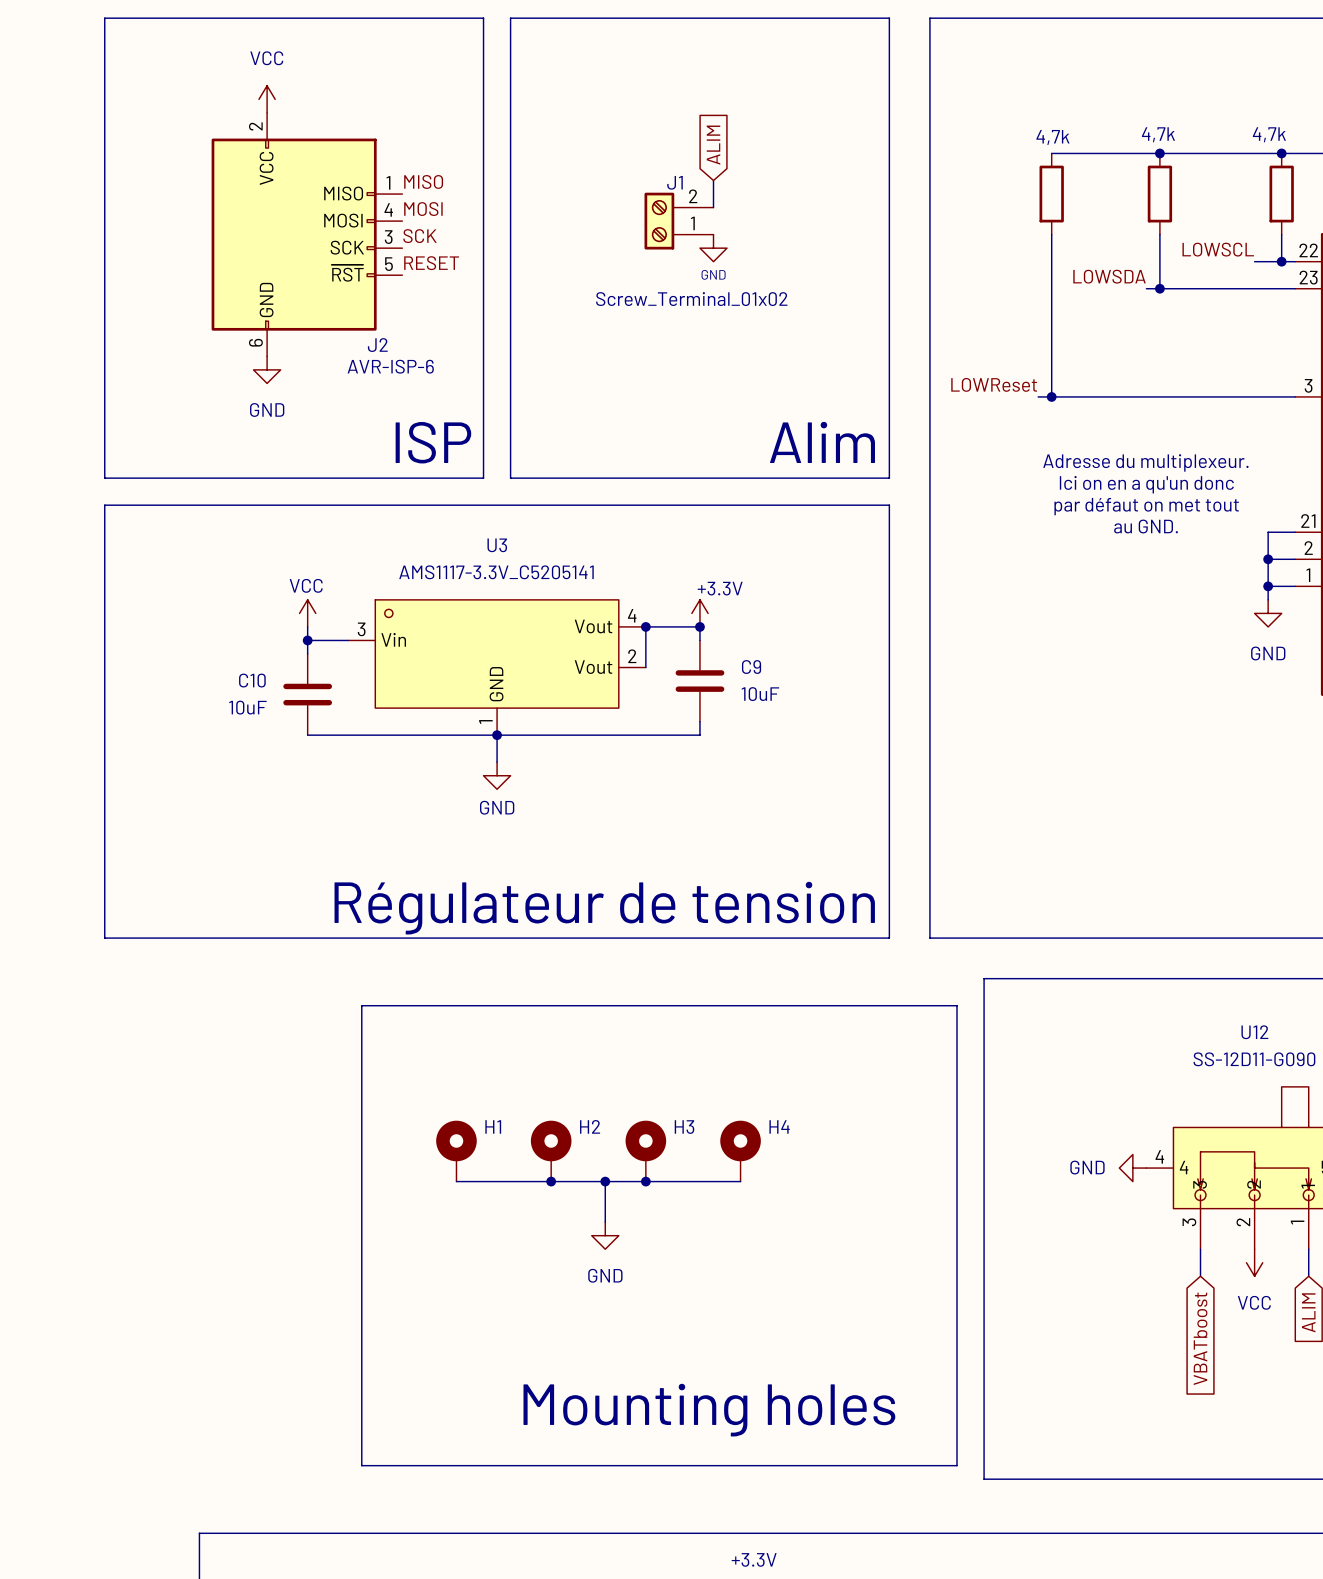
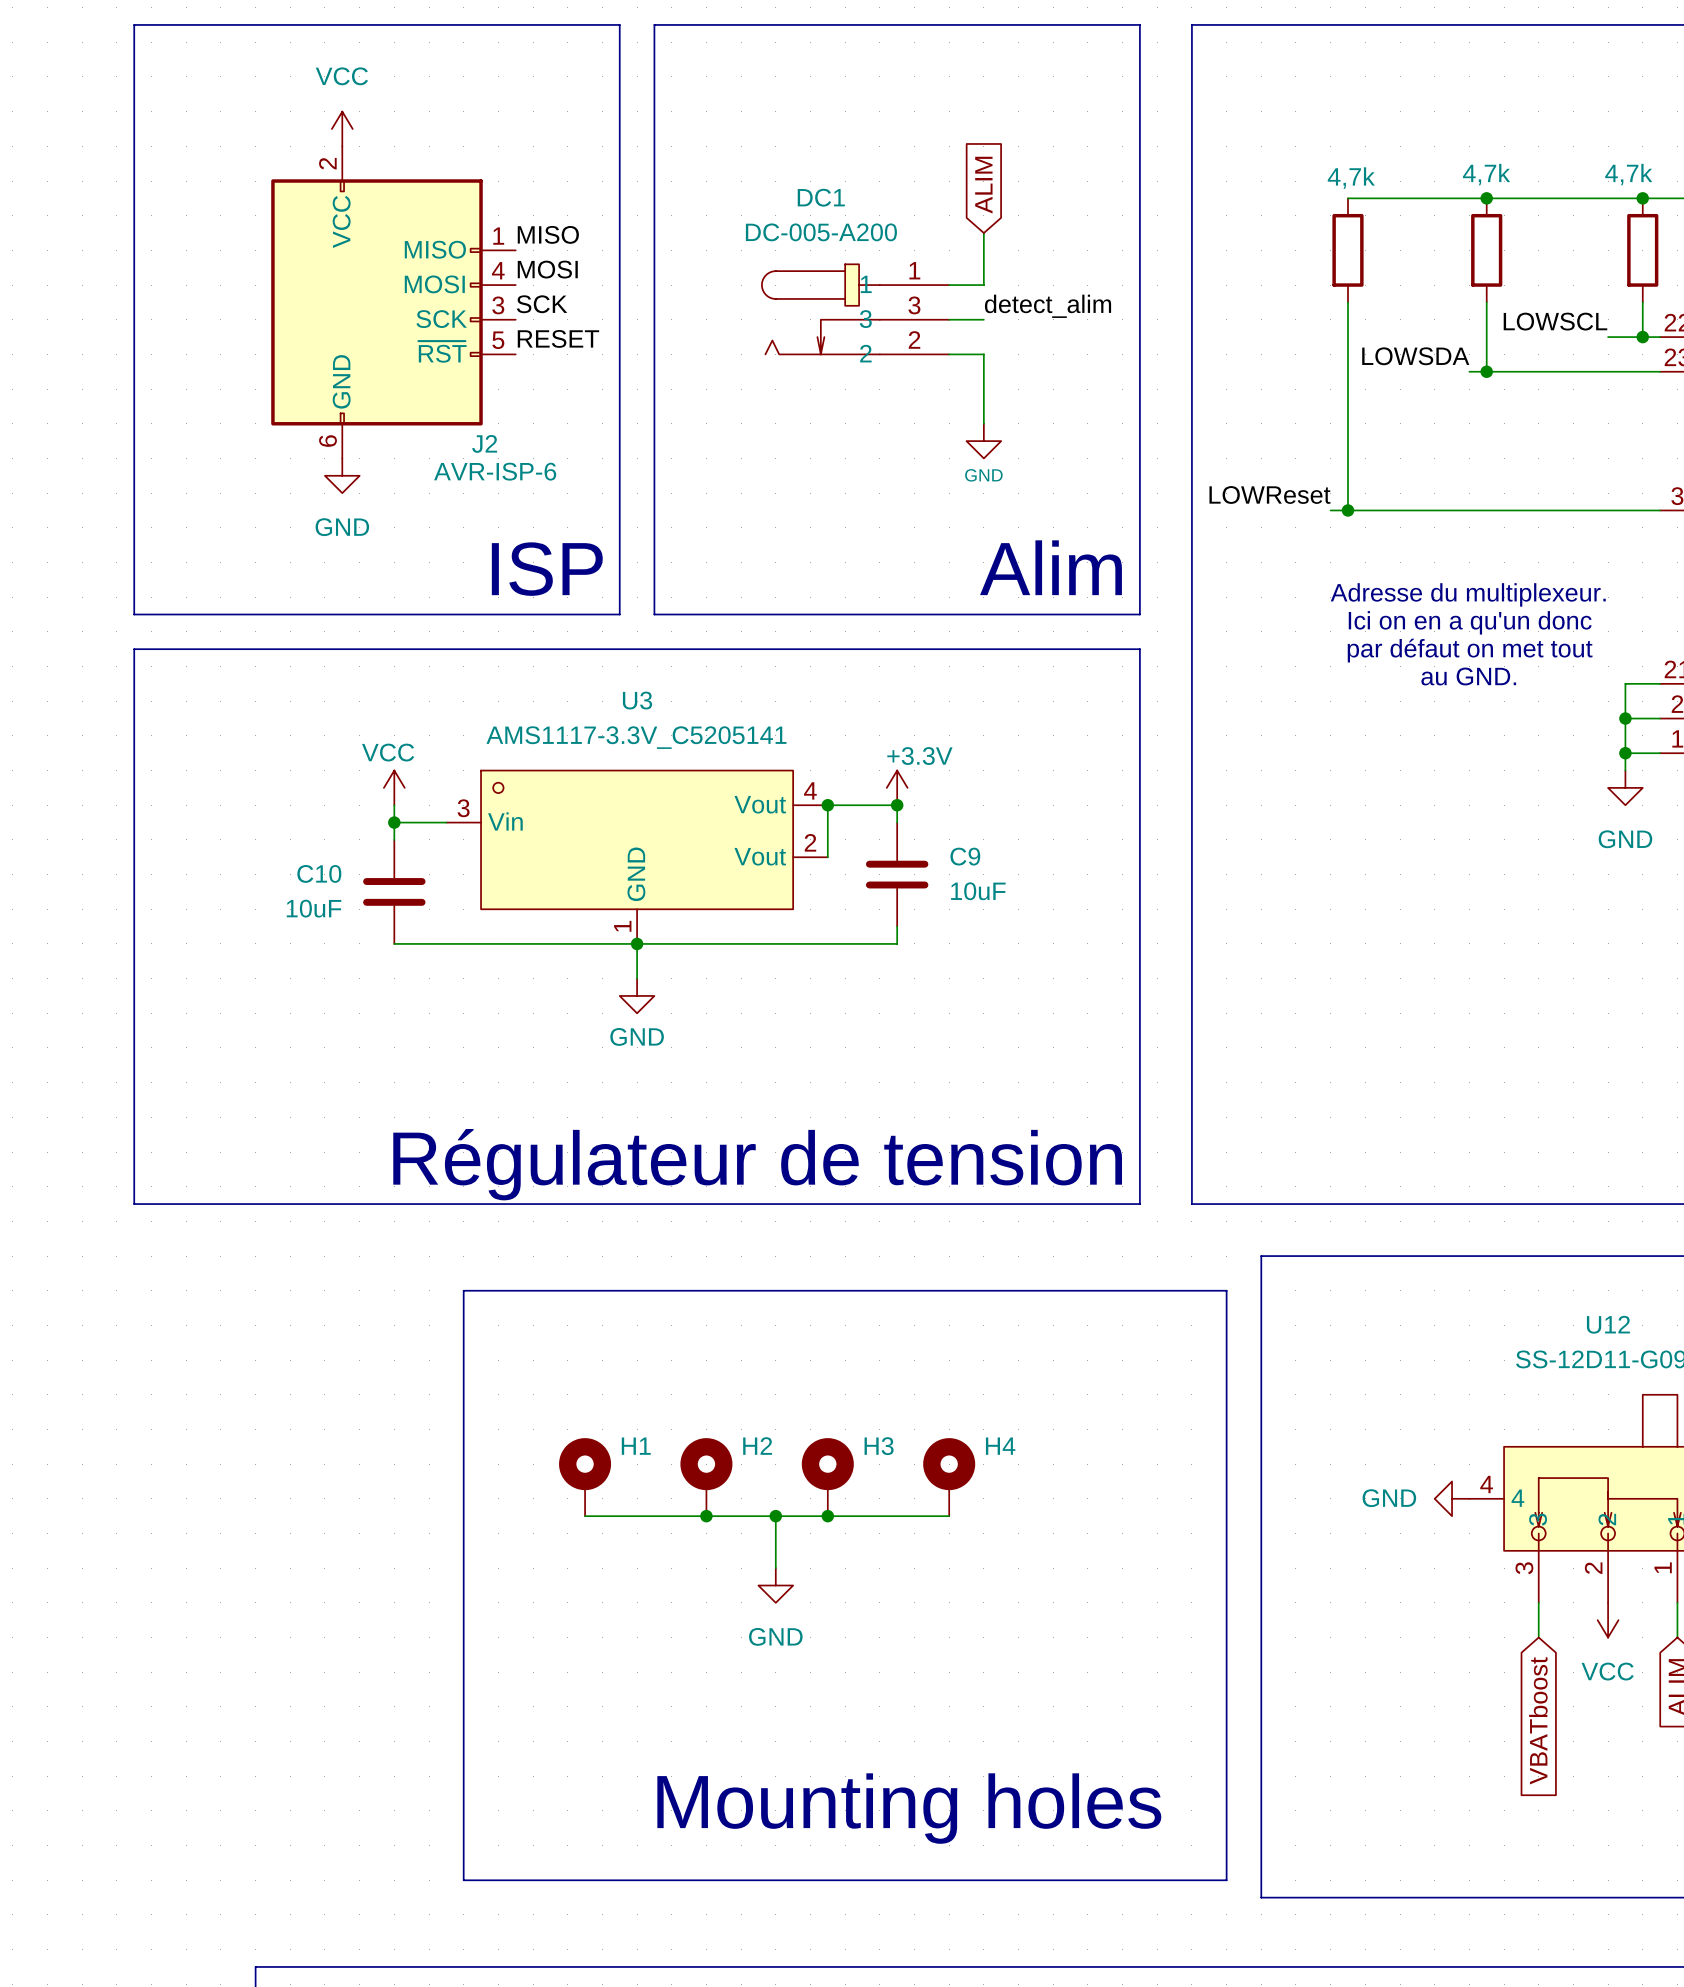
global label position: ALIM (713, 145) -> ALIM (983, 185)
wire: (713, 180) (713, 207) -> none
wire: none -> (983, 233) (983, 285) (949, 285)
J1: Screw_Terminal_01x02 (679, 221) -> none
label: none -> detect_alim (1048, 306)
DC1: none -> DC-005-A200 (855, 309)
power symbol position: GND (713, 248) -> GND (983, 441)
wire: none -> (949, 319) (983, 319)
wire: none -> (949, 354) (983, 354) (983, 423)

